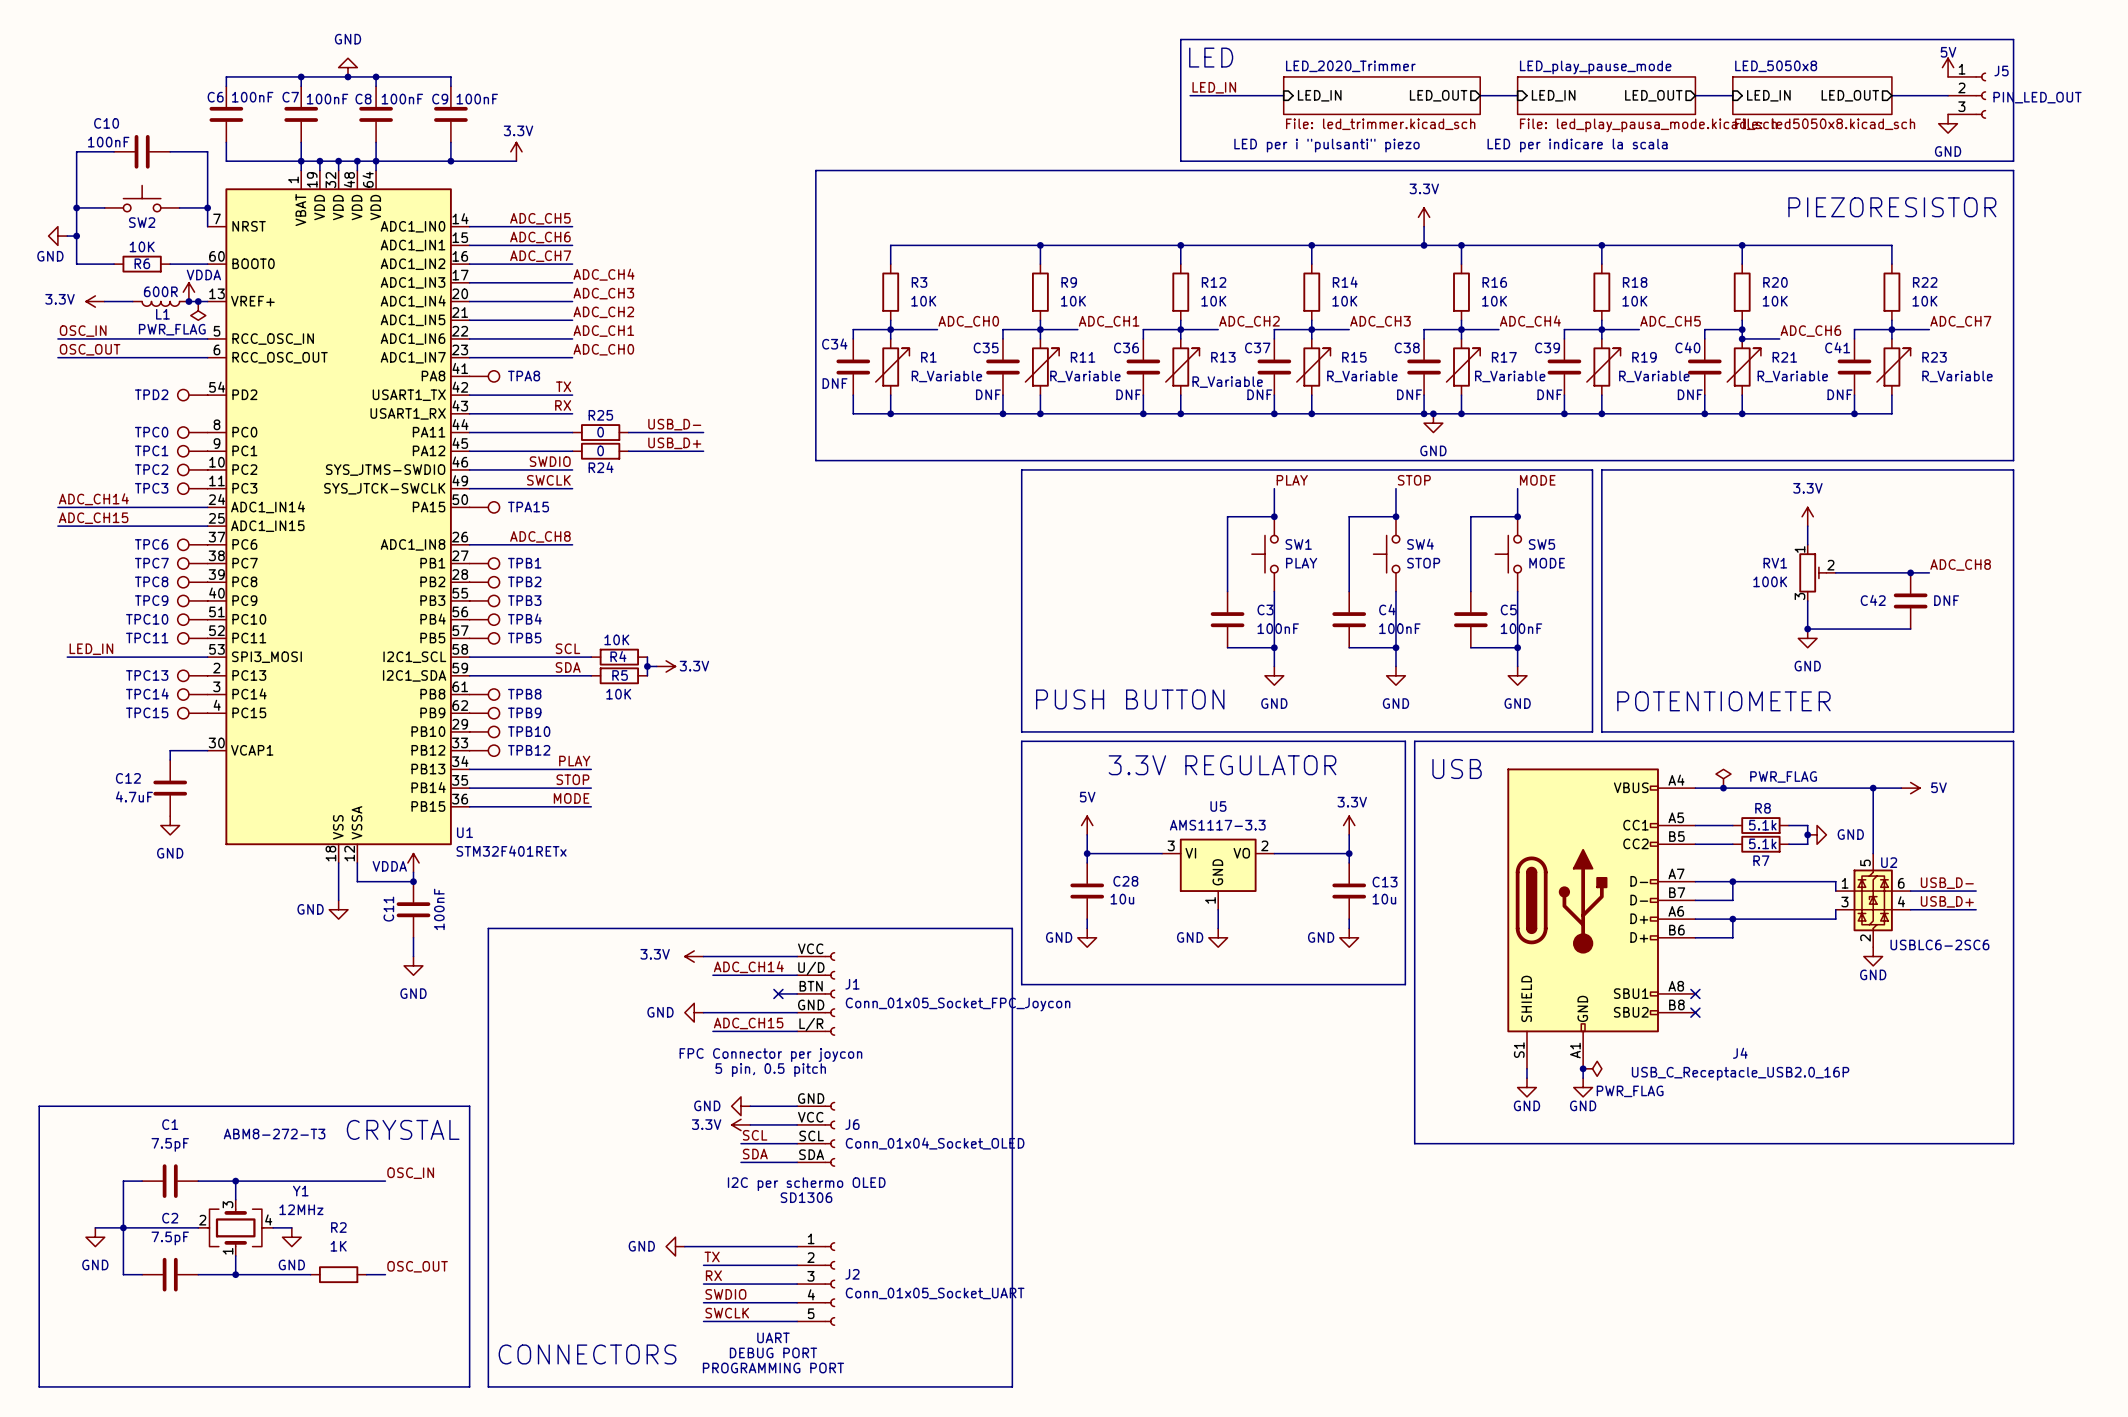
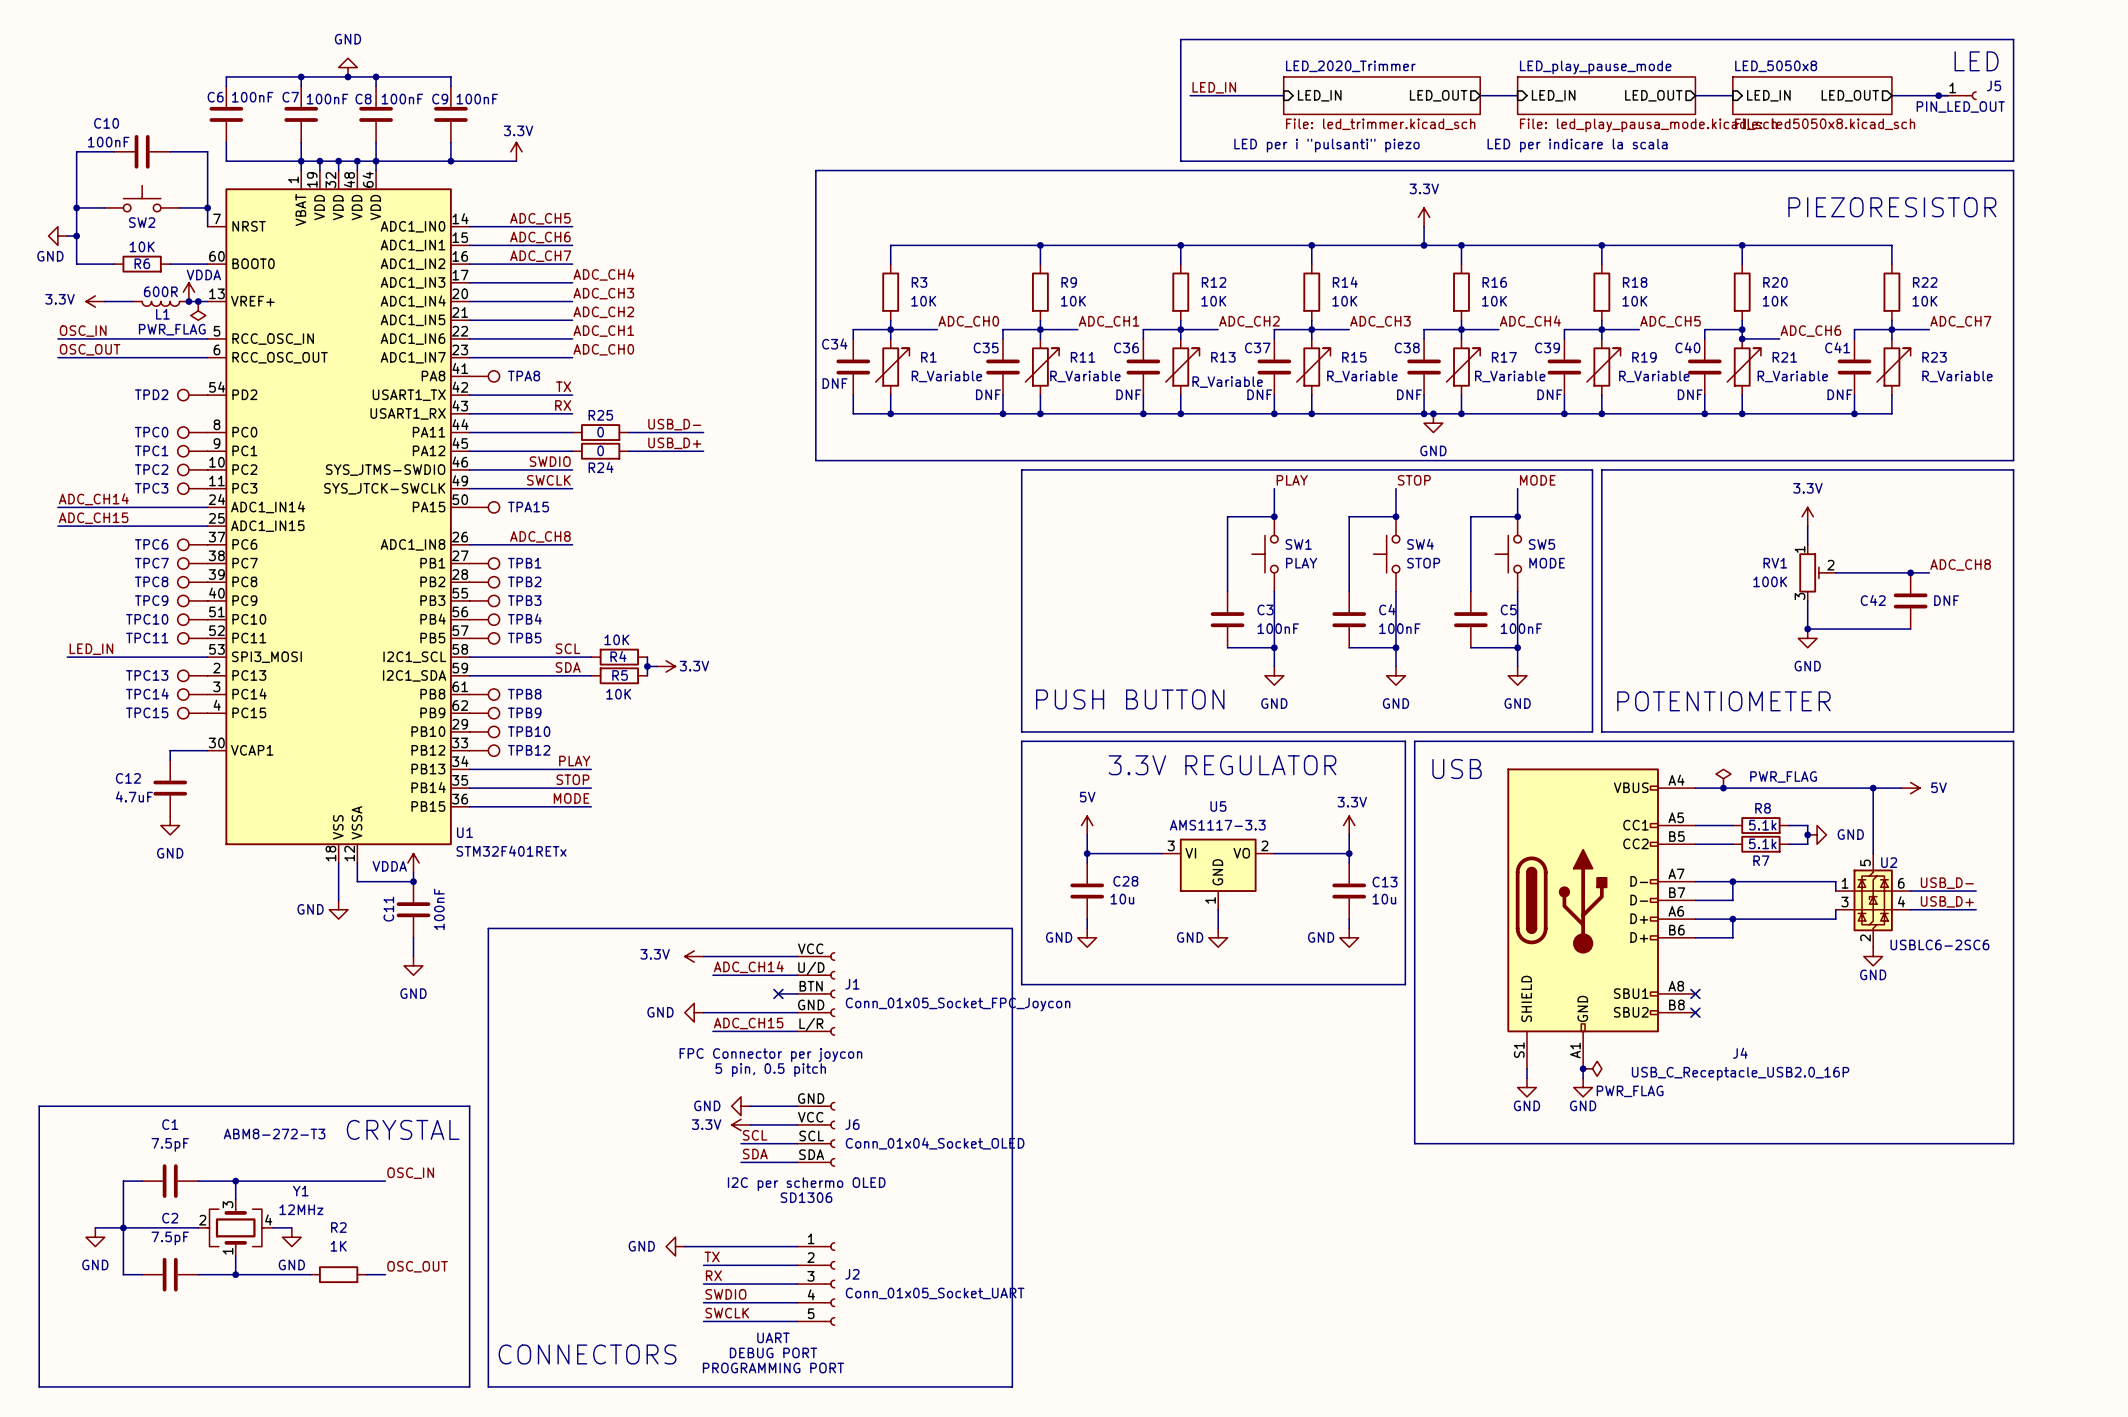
text: LED (1211, 57) -> none
text: none -> LED (1976, 61)
power symbol: 5V (1948, 67) -> none
J5 name position: J5 (2001, 71) -> J5 (1994, 85)
J5 symbol: [1948, 72, 1987, 119] -> [1938, 91, 1977, 100]
junction: none -> (1938, 95)
J5 value position: PIN_LED_OUT (2037, 97) -> PIN_LED_OUT (1960, 107)
power symbol: GND (1948, 123) -> none

